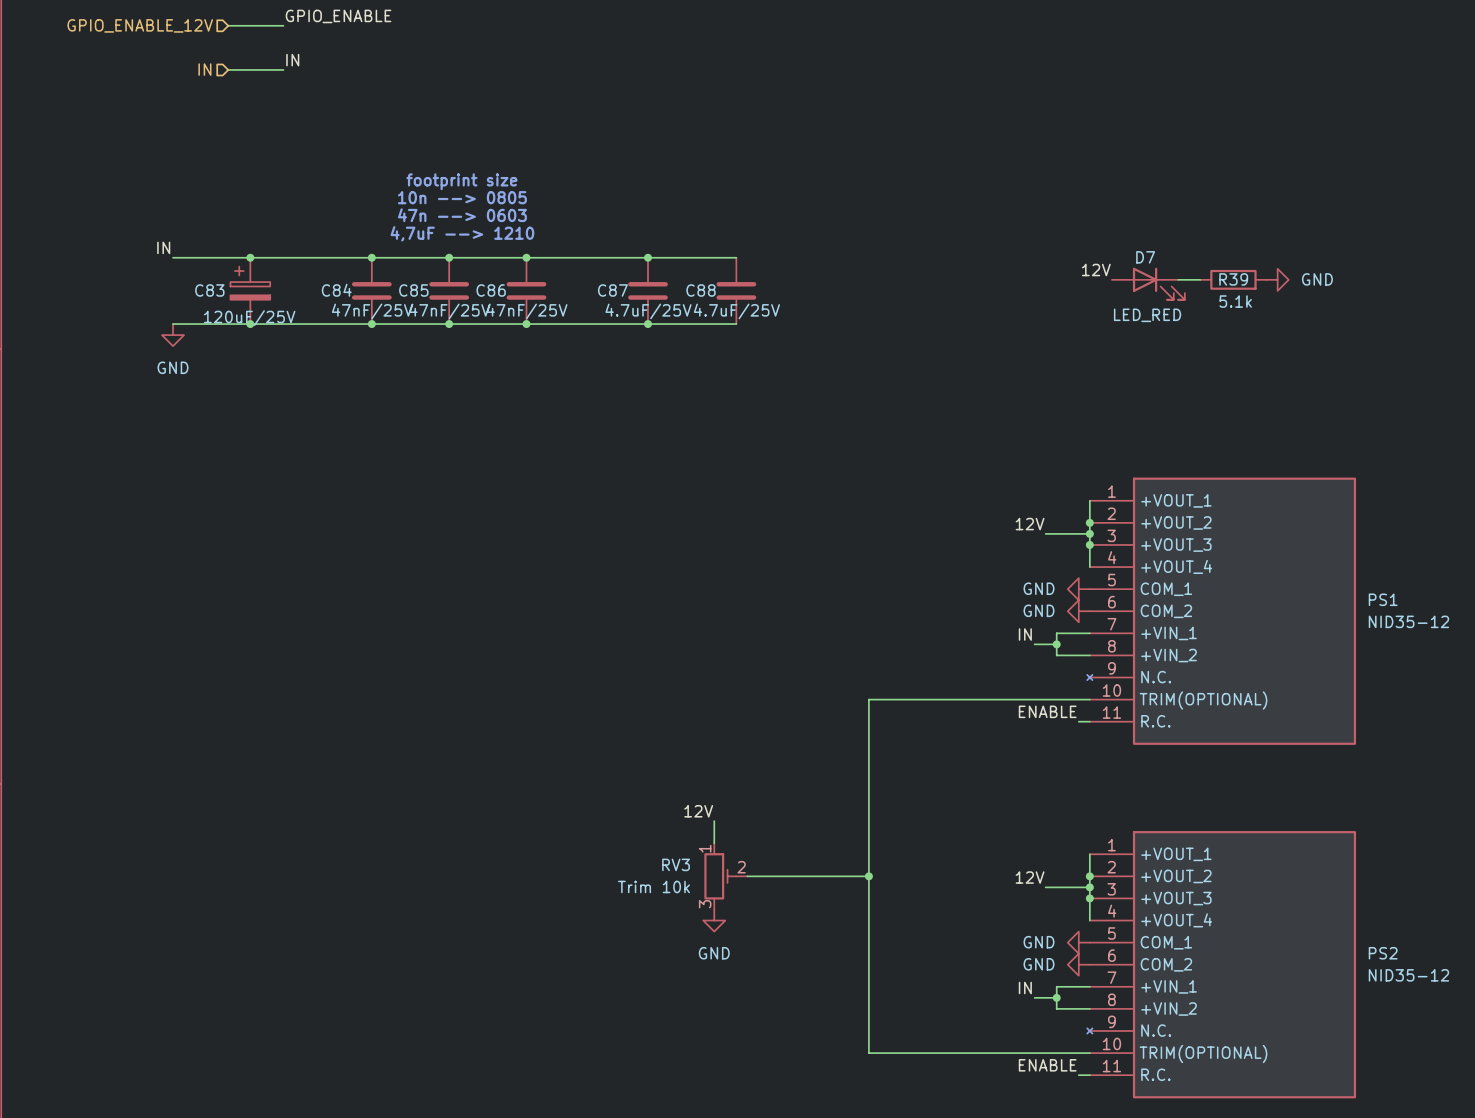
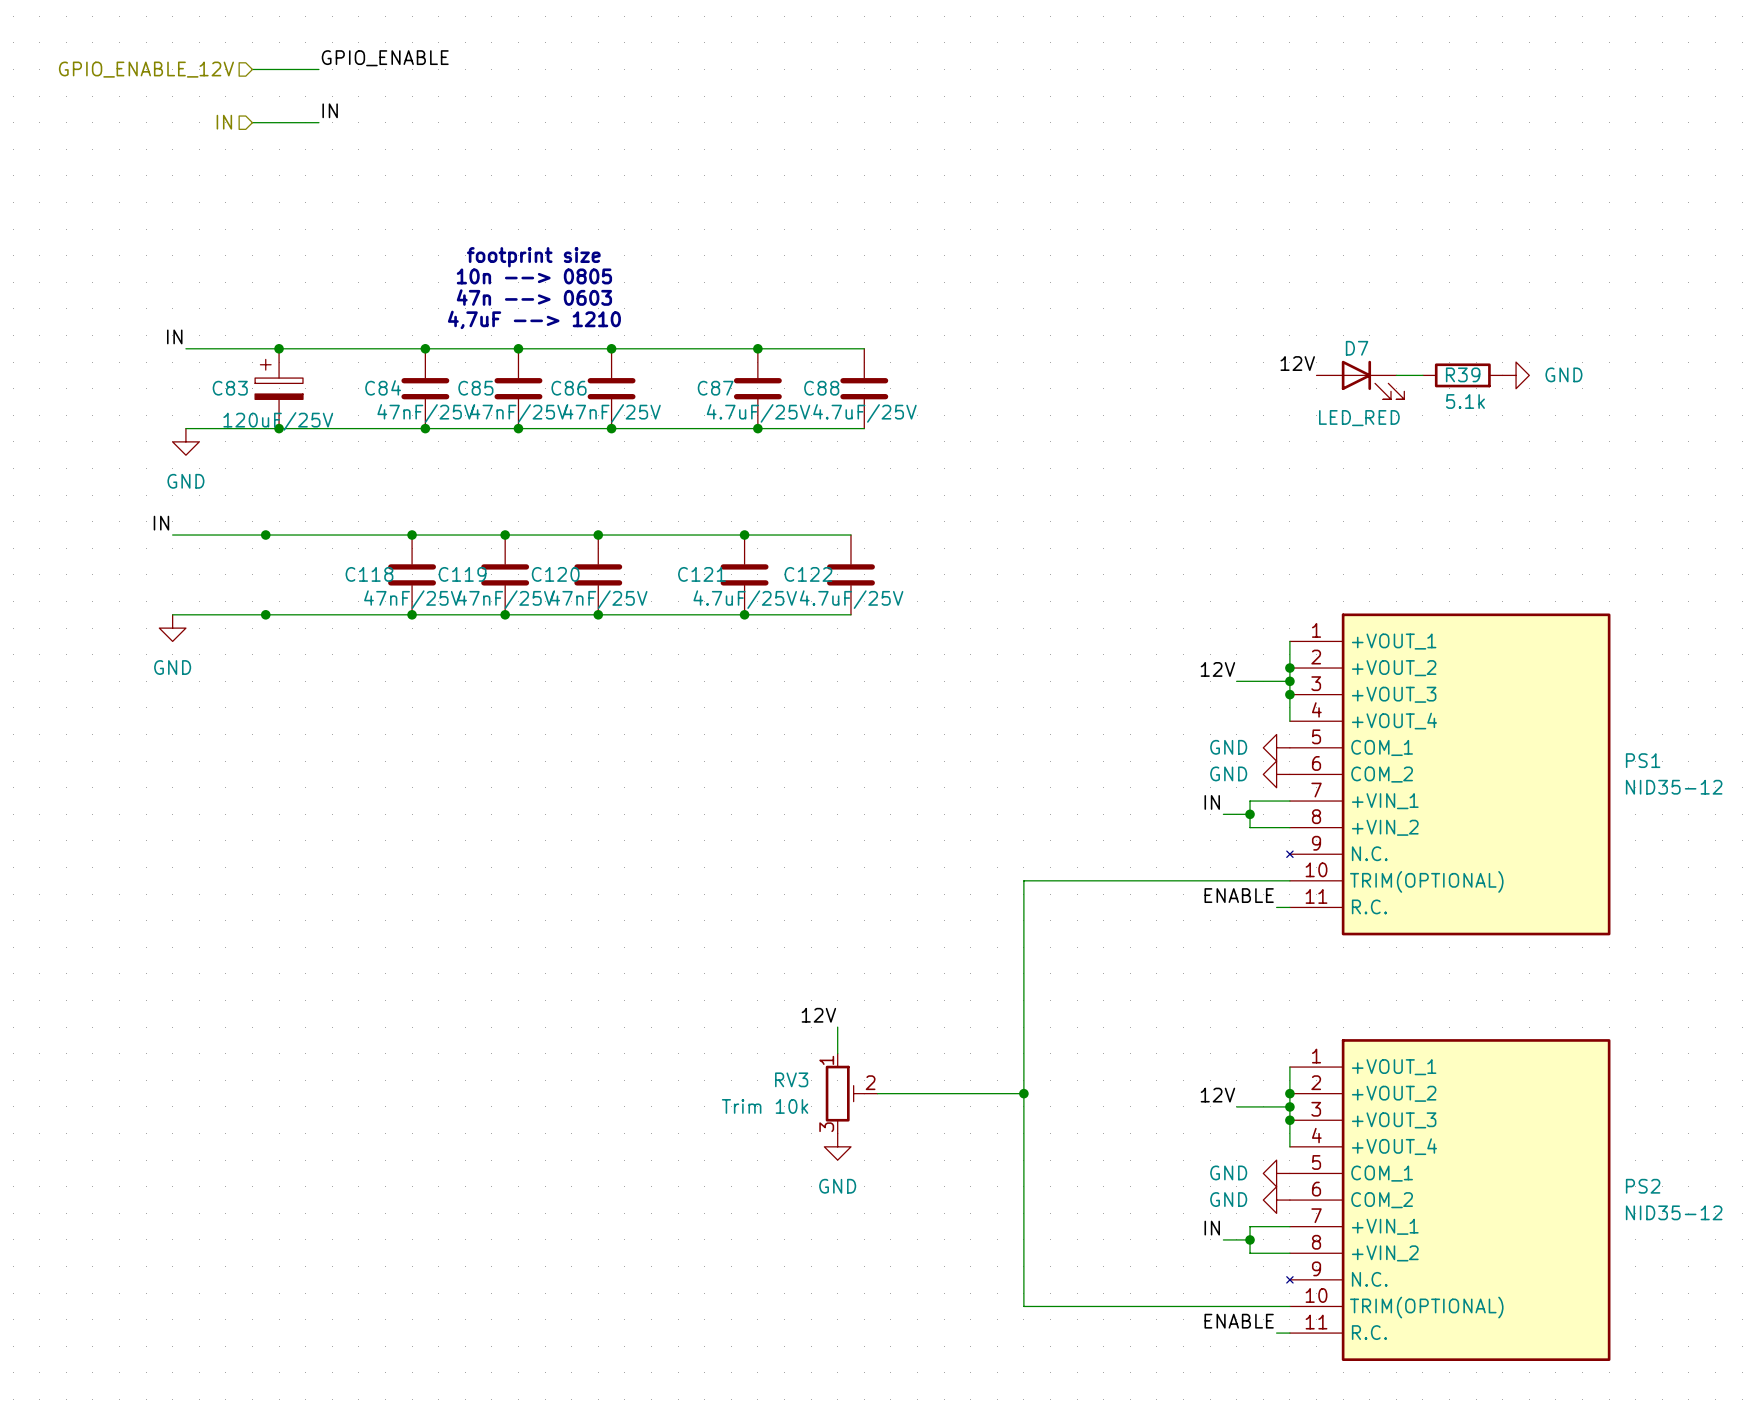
label: none -> IN (161, 523)
wire: none -> (172, 535) (850, 535)
junction: none -> (265, 535)
junction: none -> (412, 535)
junction: none -> (505, 535)
junction: none -> (598, 535)
junction: none -> (744, 535)
C118: none -> 47nF/25V (412, 574)
C119: none -> 47nF/25V (505, 574)
C120: none -> 47nF/25V (598, 574)
C121: none -> 4.7uF/25V (744, 574)
C122: none -> 4.7uF/25V (850, 574)
wire: none -> (172, 614) (850, 614)
junction: none -> (265, 614)
junction: none -> (412, 614)
junction: none -> (505, 614)
junction: none -> (598, 614)
junction: none -> (744, 614)
power symbol: none -> GND (172, 628)

